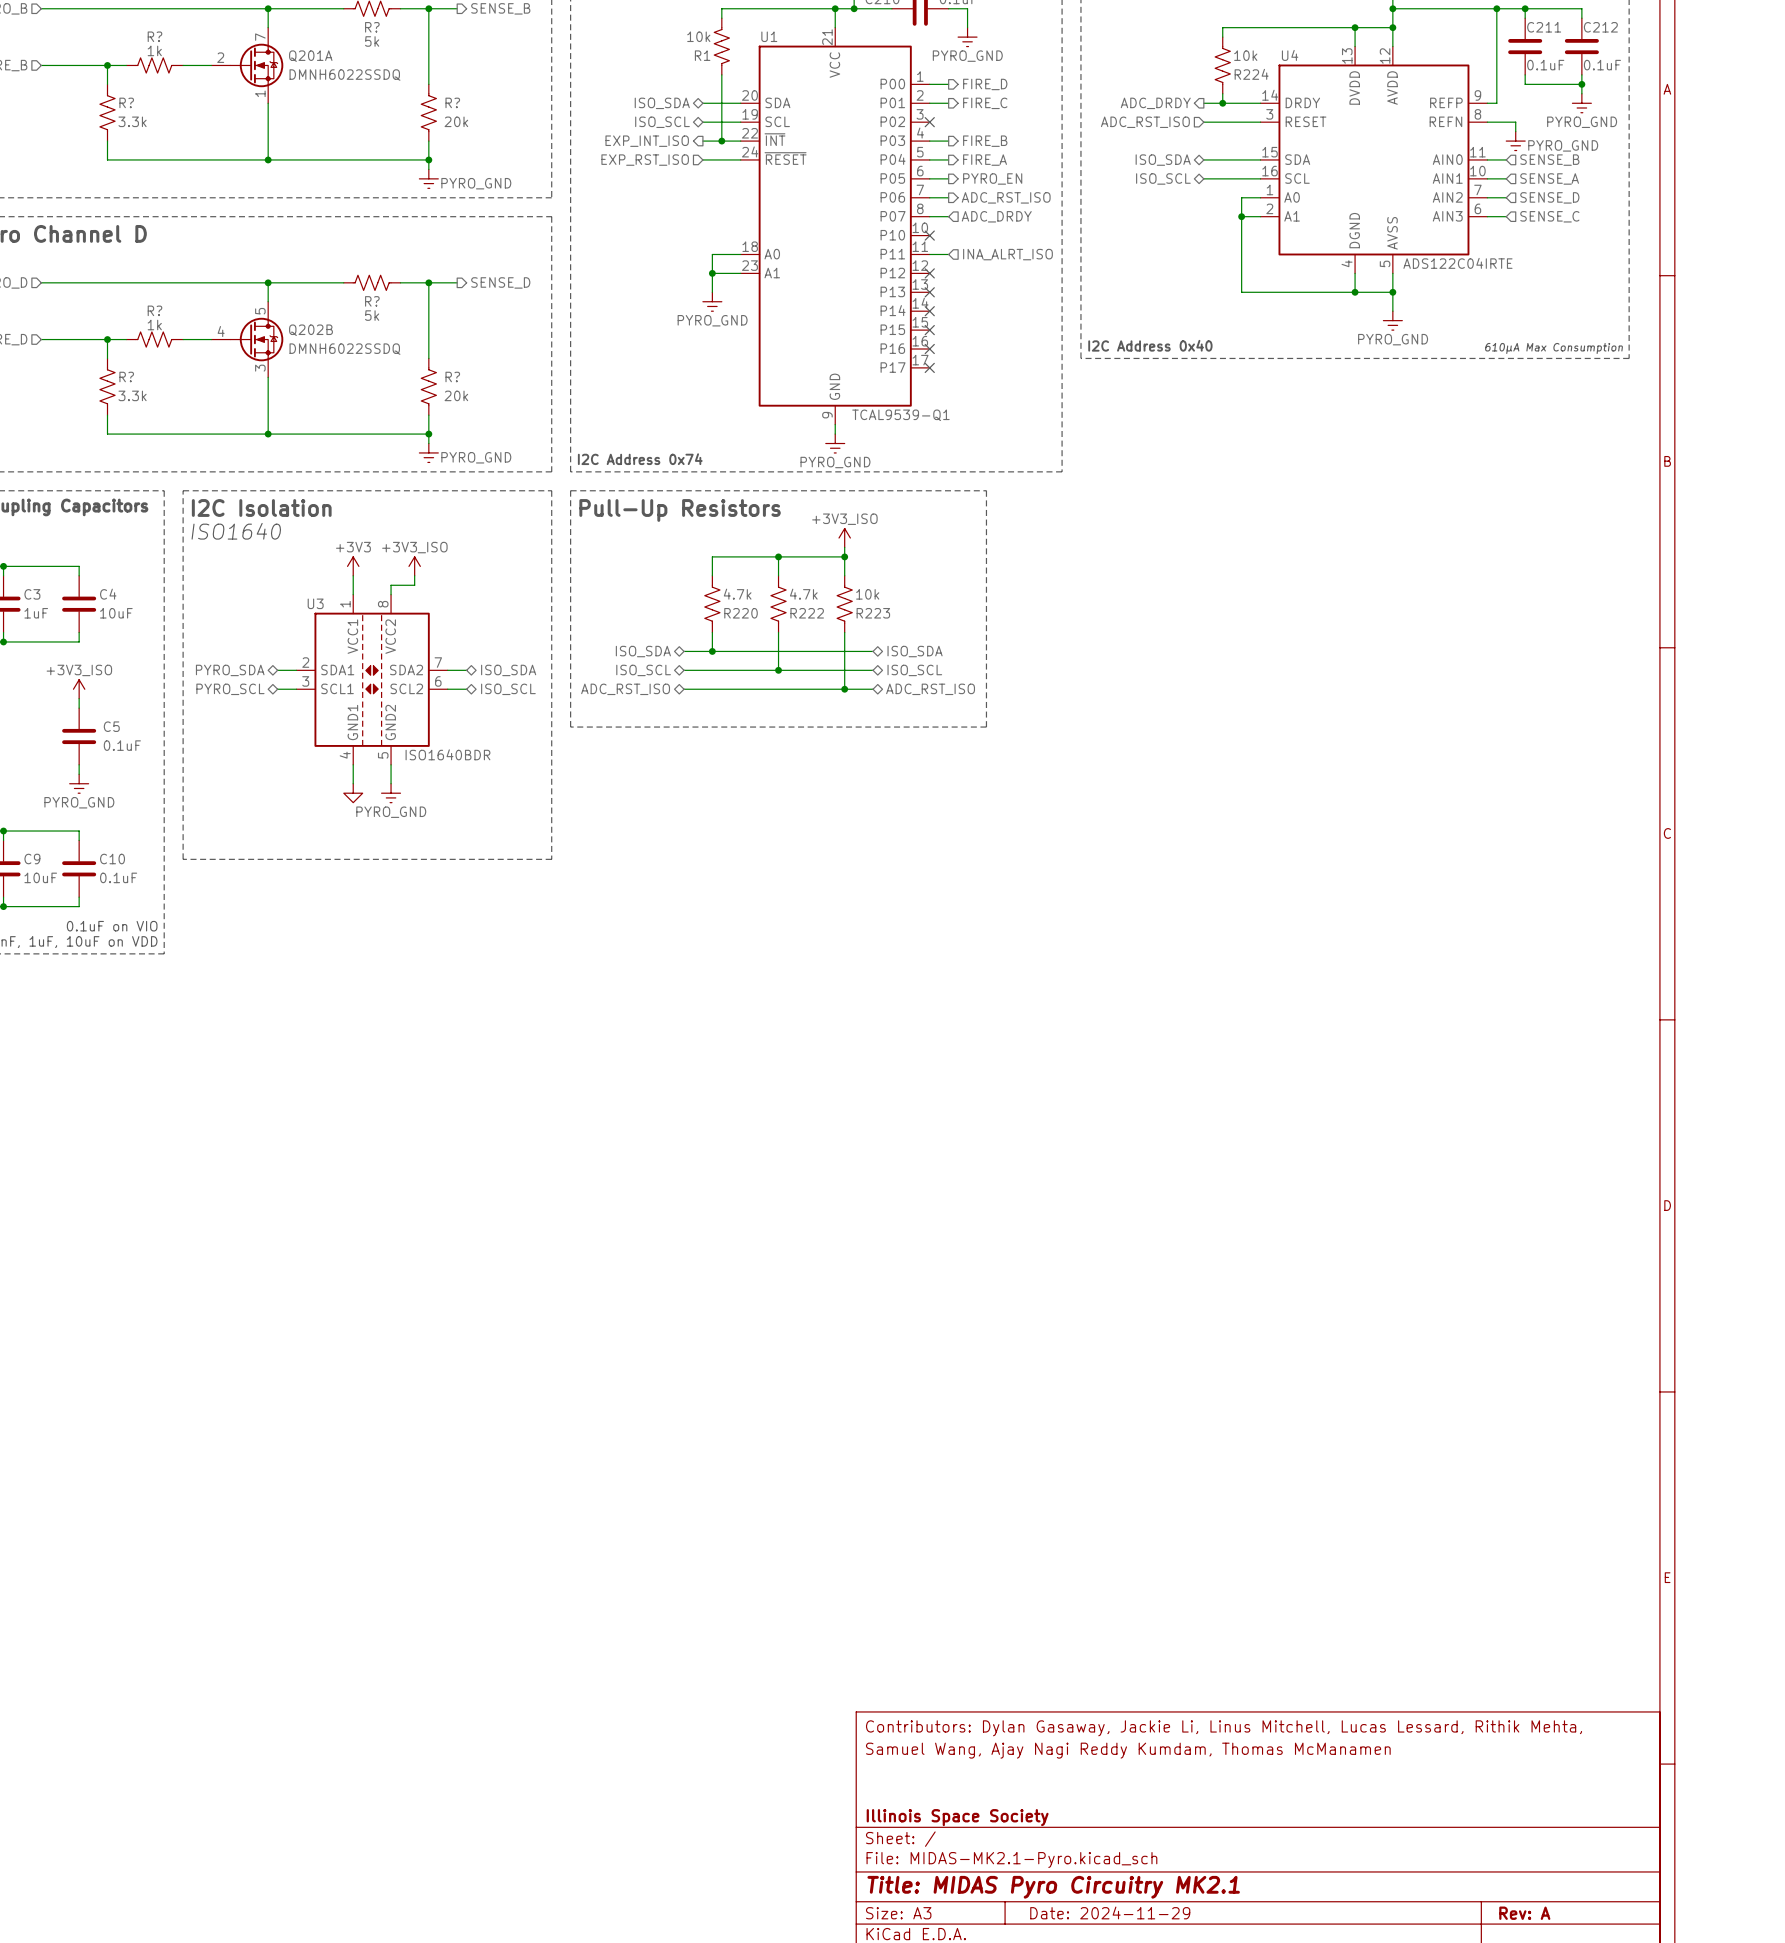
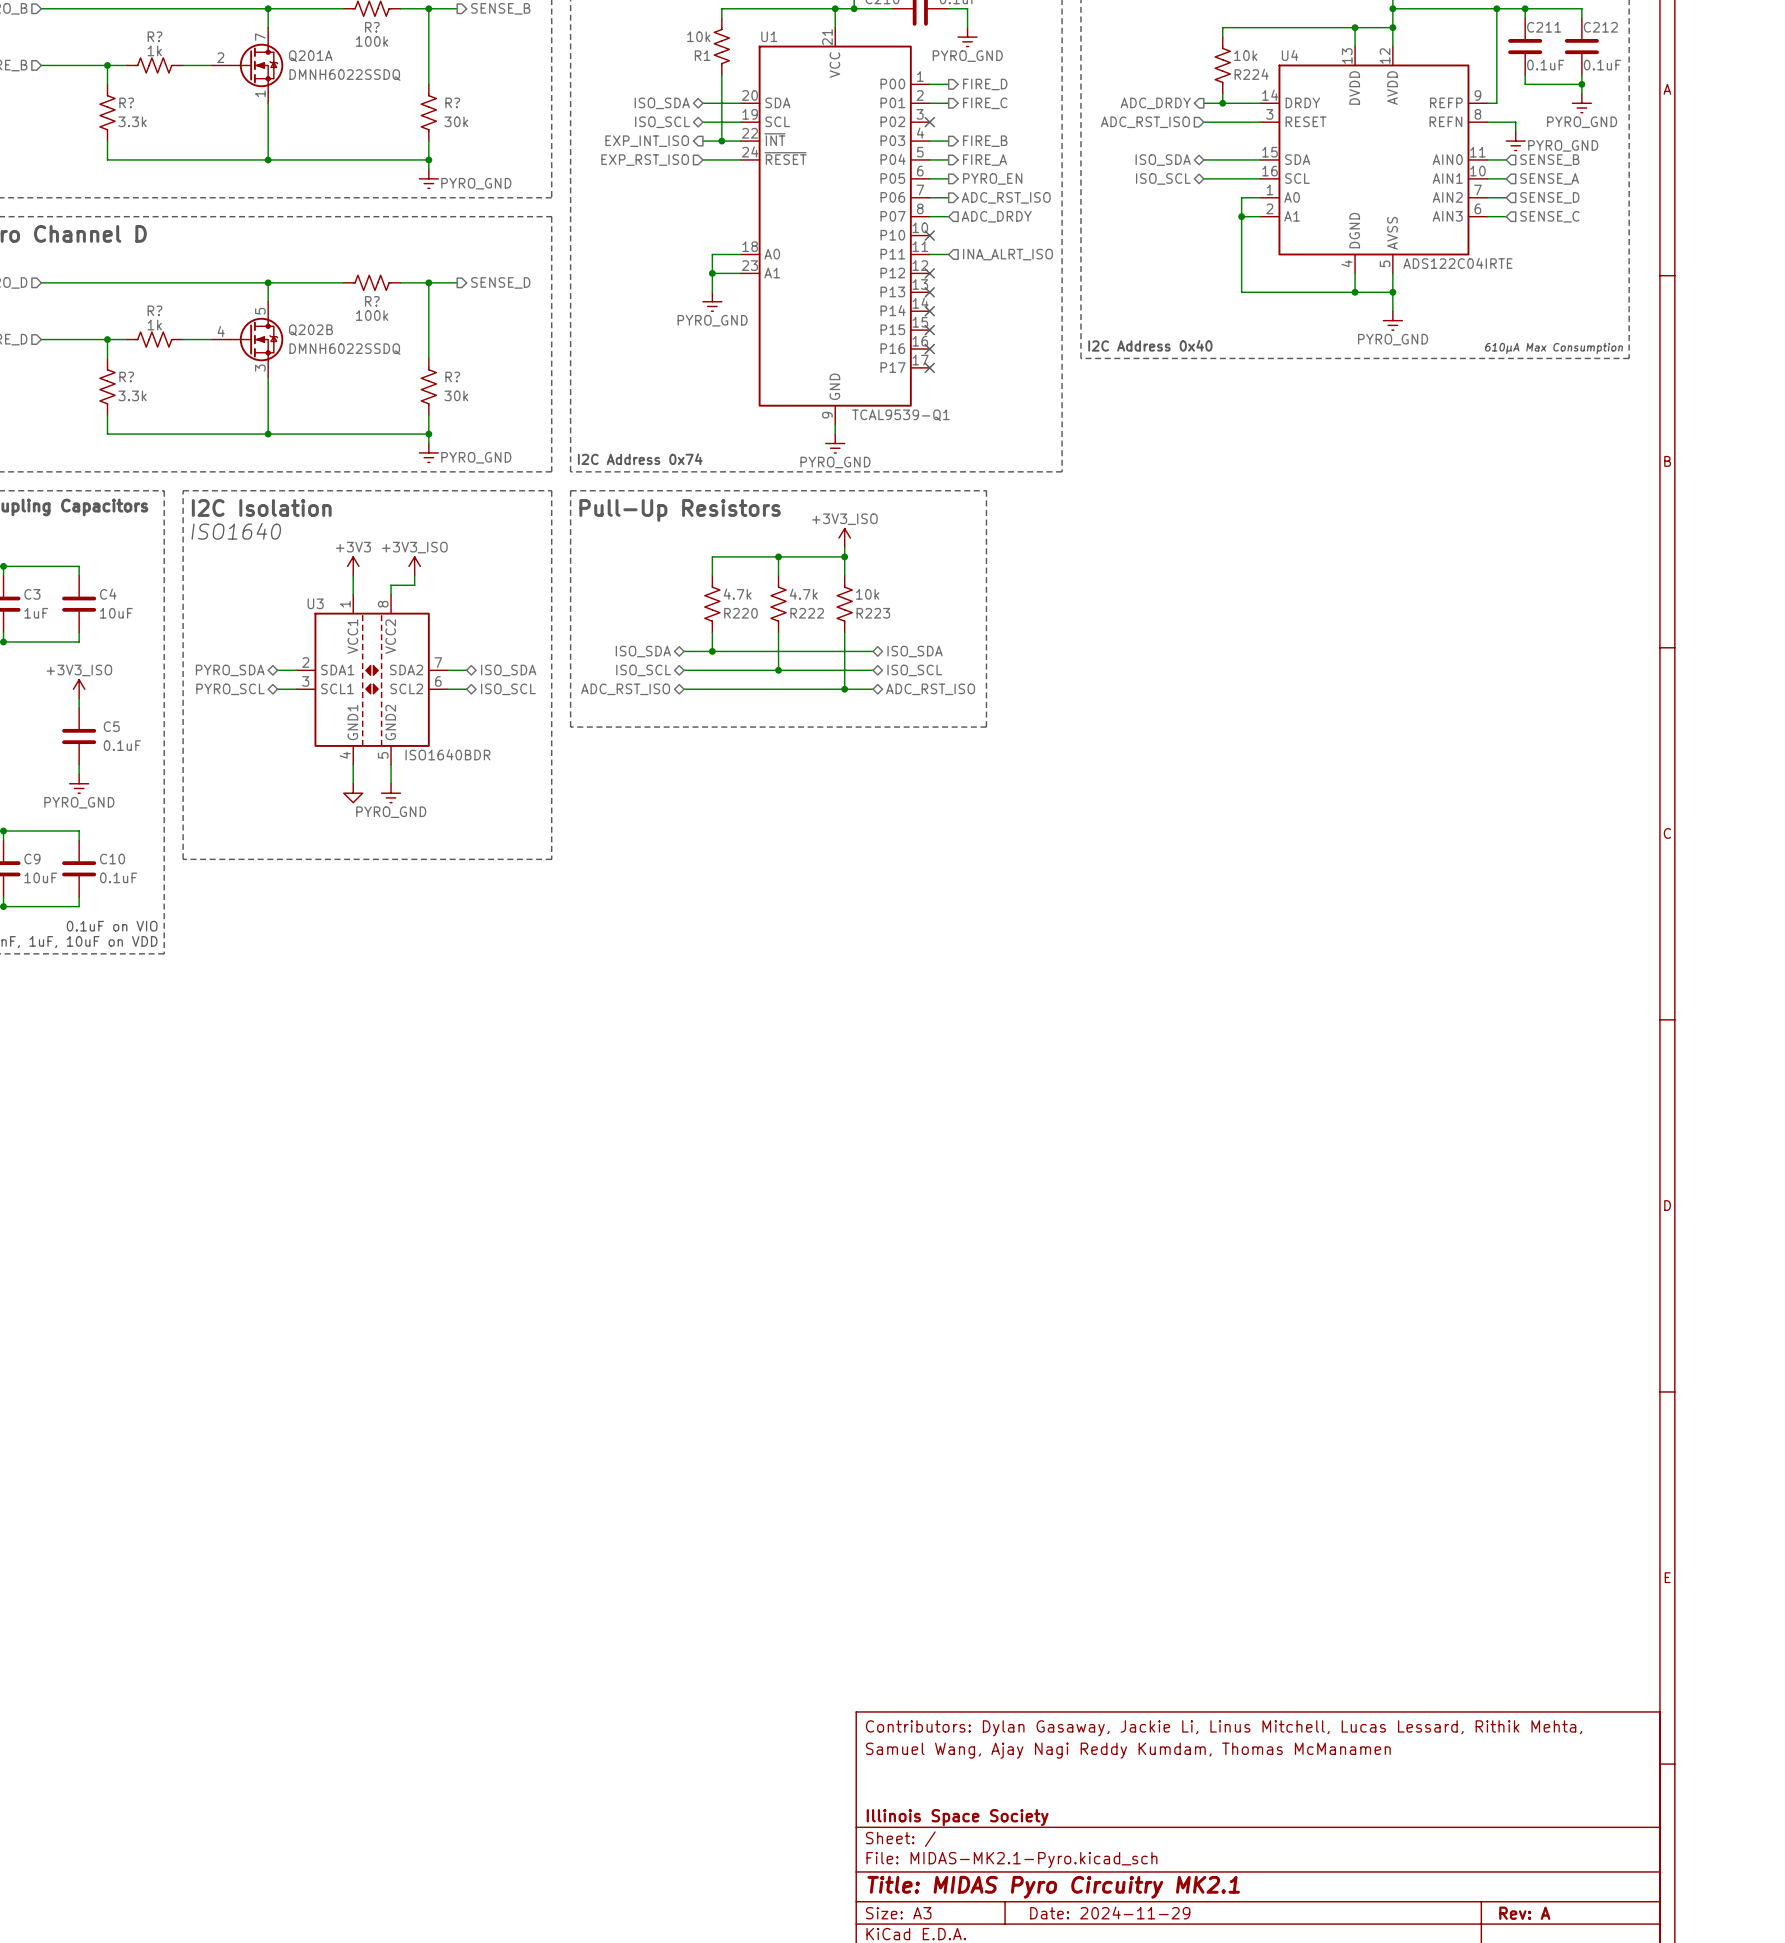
R? value: 5k (372, 41) -> 100k (372, 41)
R? value: 20k (456, 121) -> 30k (456, 121)
R? value: 5k (372, 315) -> 100k (372, 315)
R? value: 20k (456, 395) -> 30k (456, 395)

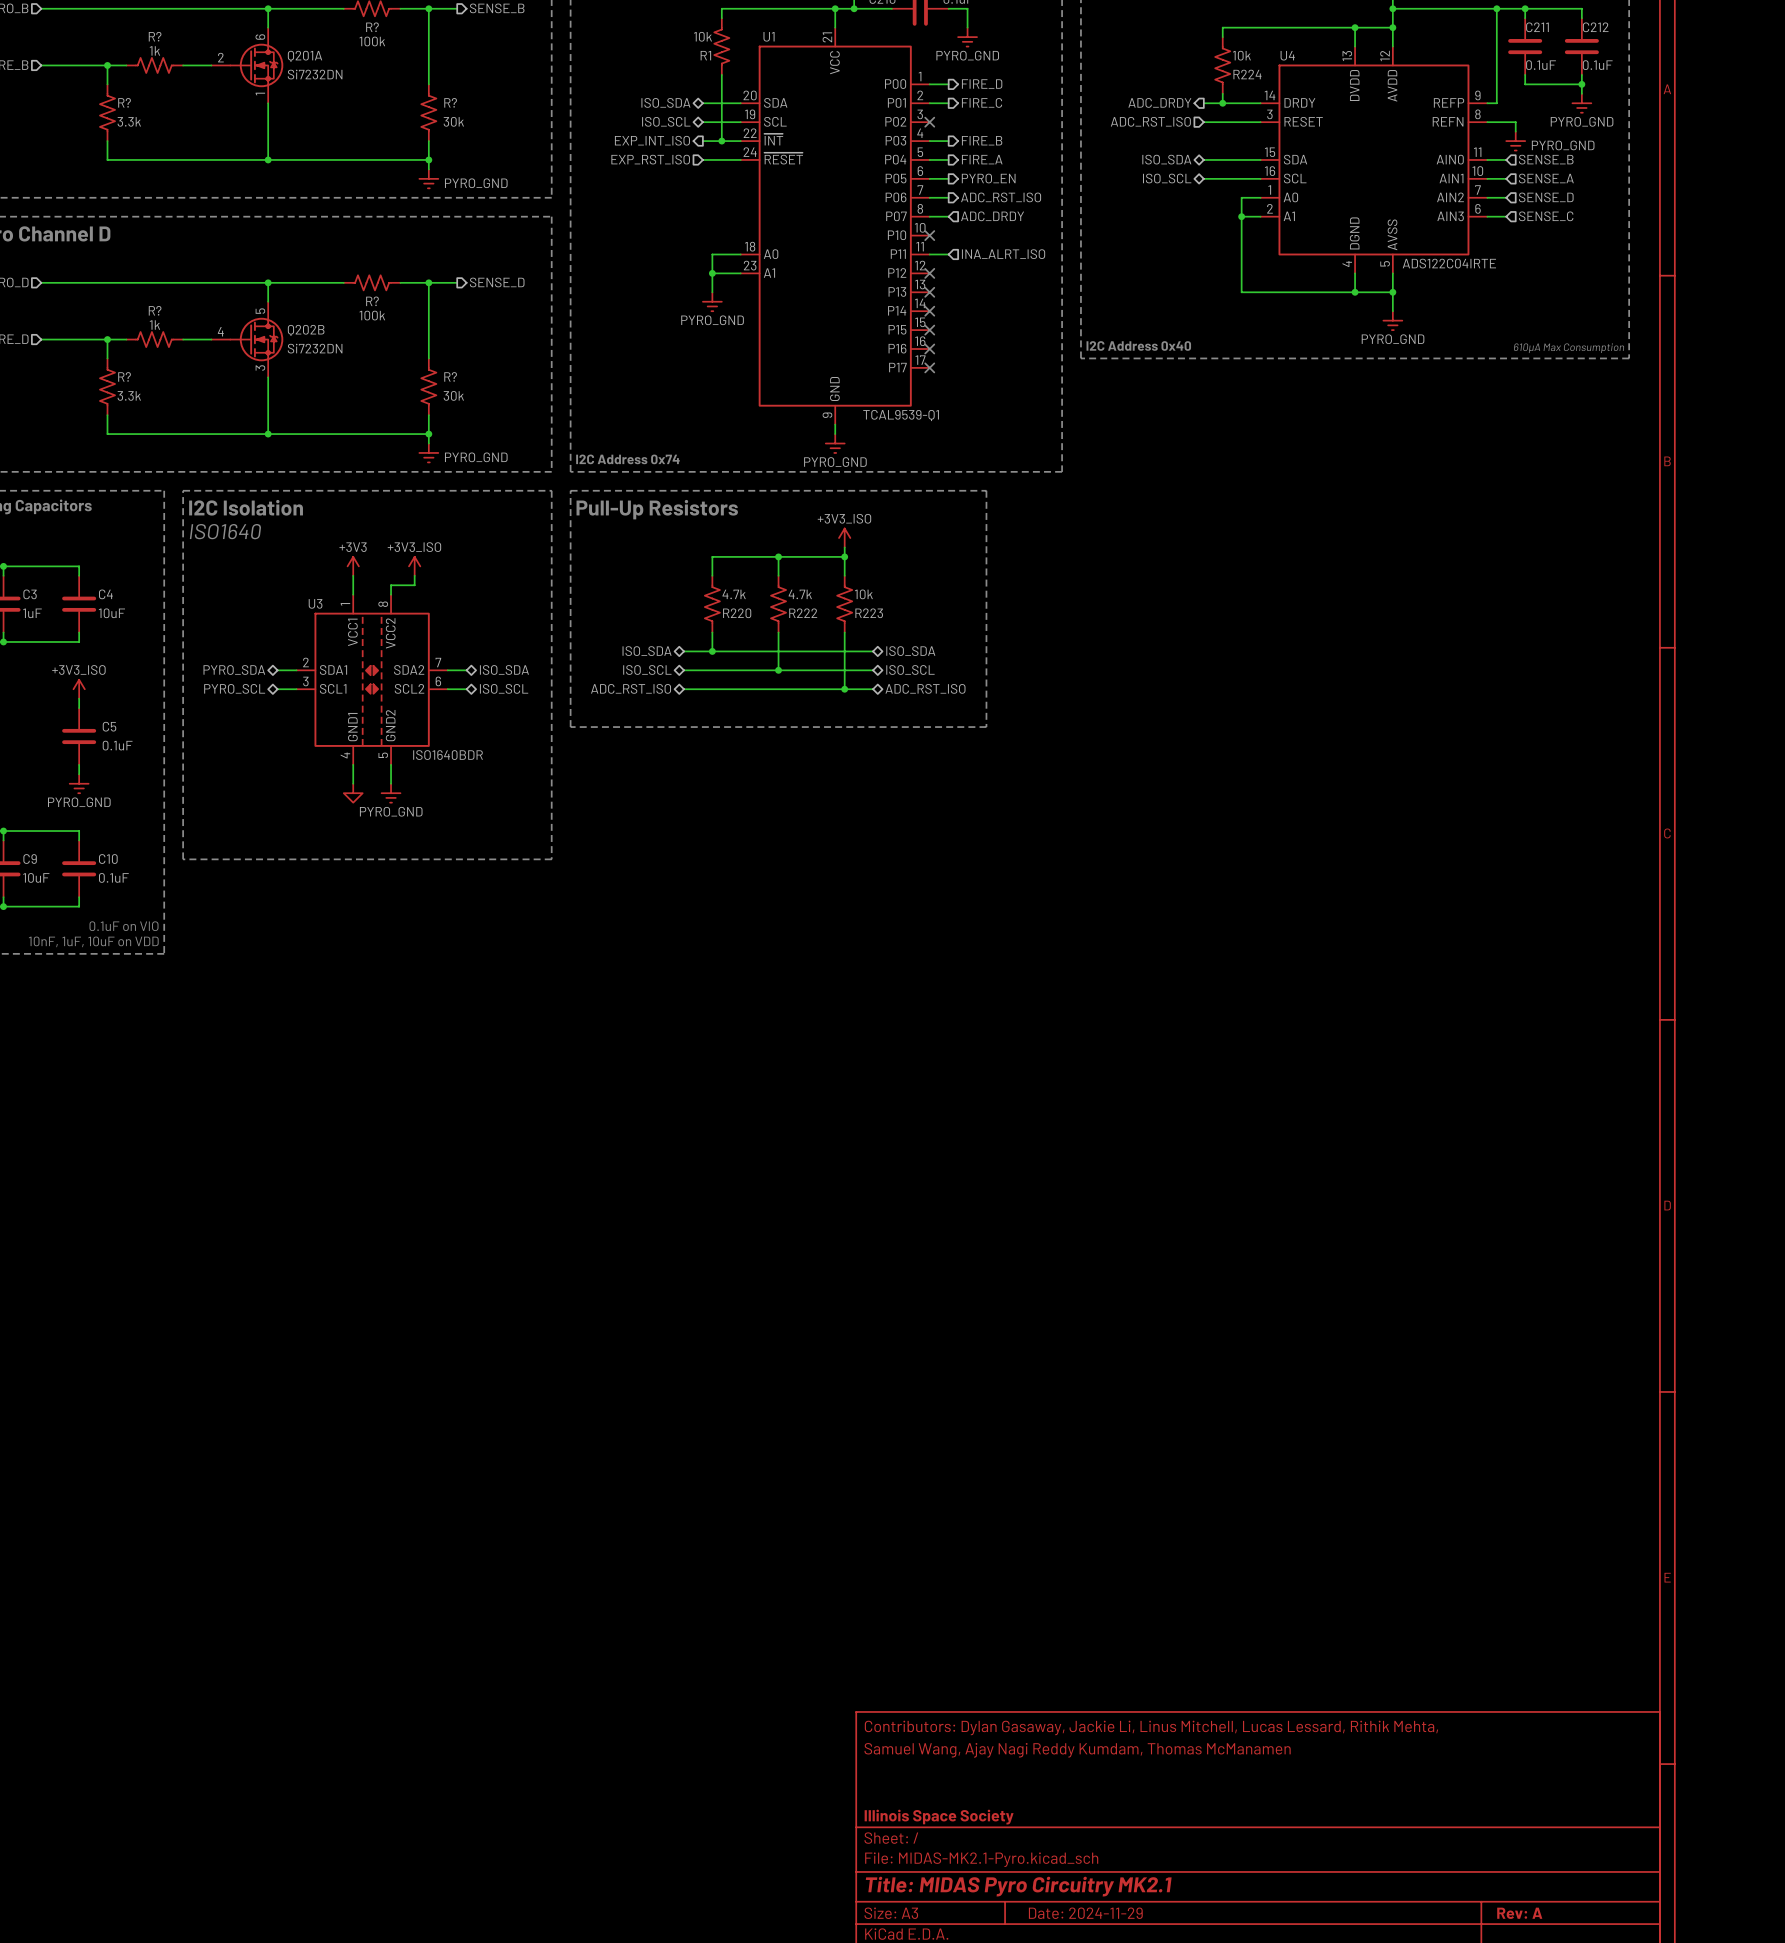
Q201A pin number: 7 (260, 37) -> 6 (260, 37)
Q201A value: DMNH6022SSDQ (344, 75) -> Si7232DN (315, 74)
Q202B value: DMNH6022SSDQ (344, 349) -> Si7232DN (315, 348)

